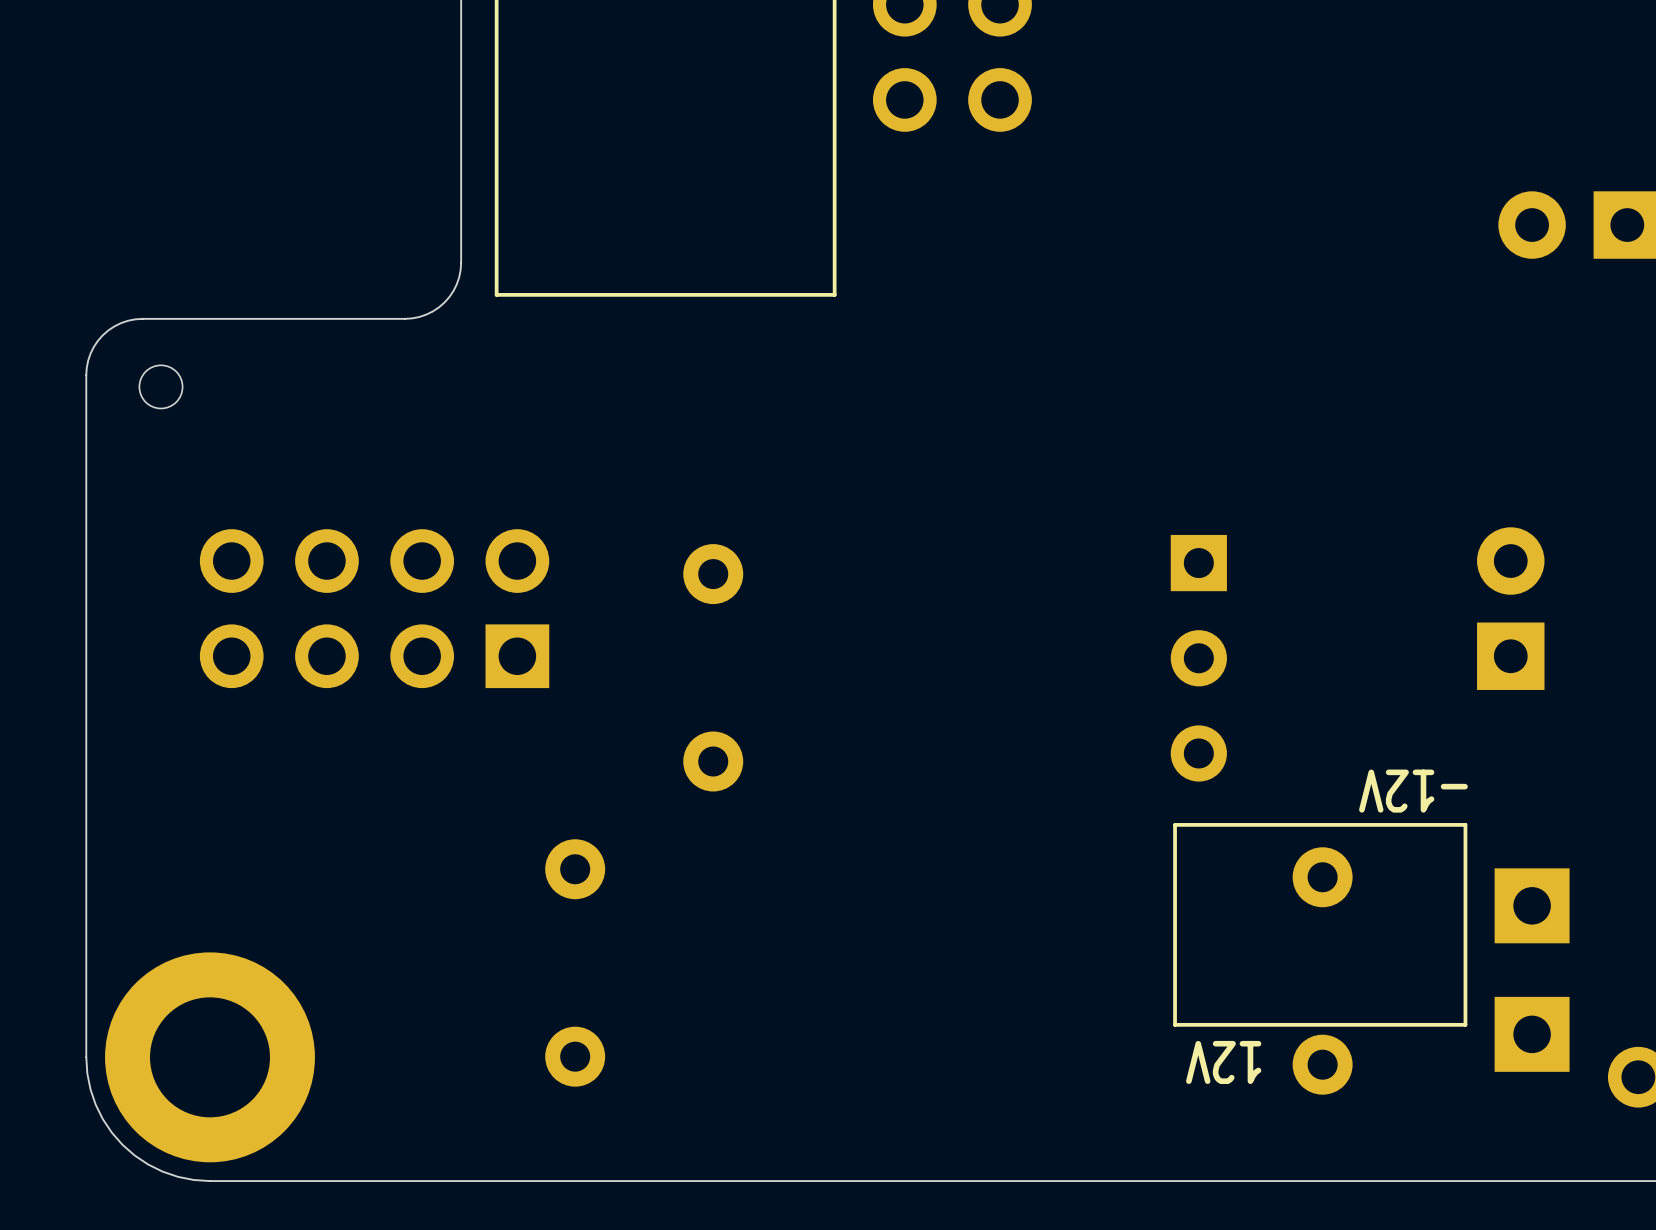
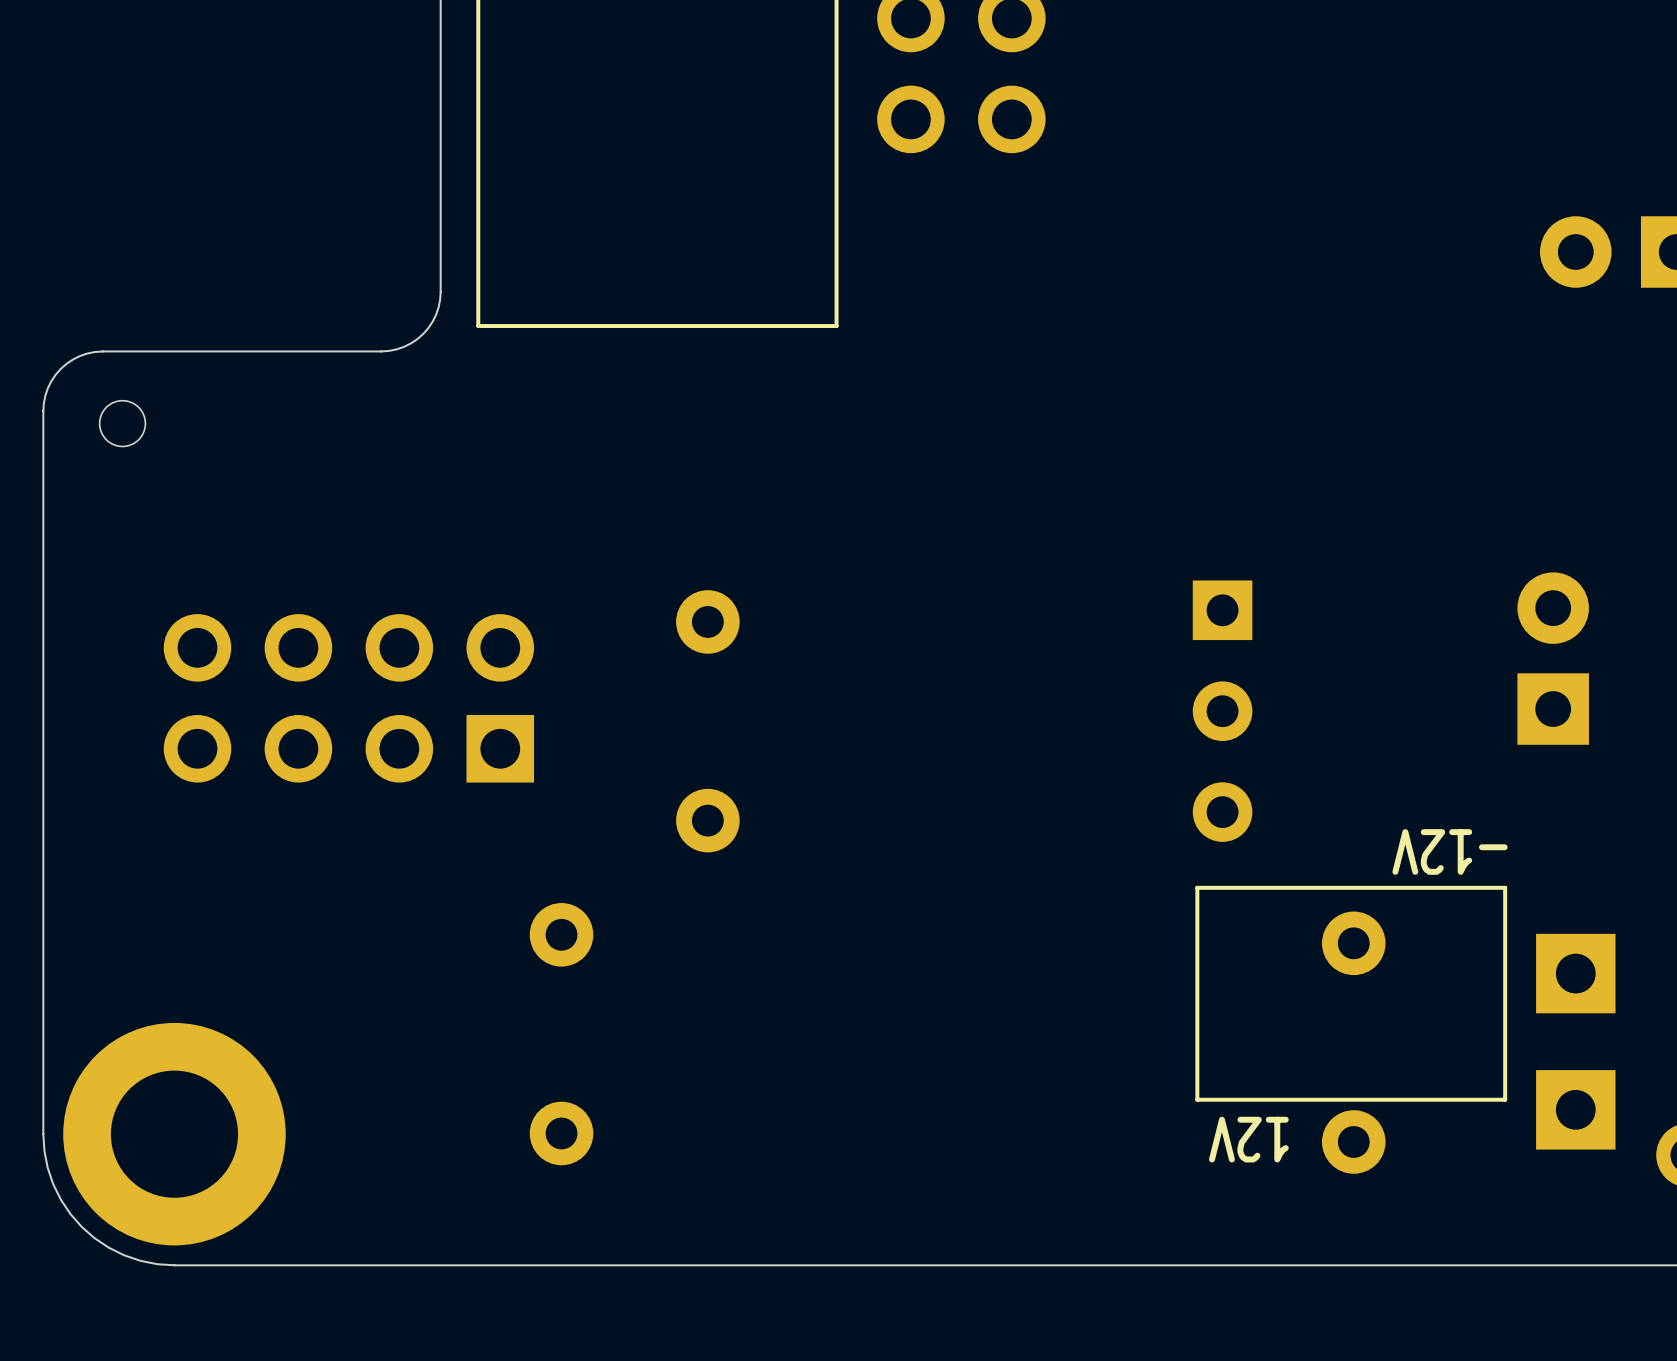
part position: (374, 608) -> (348, 698)

